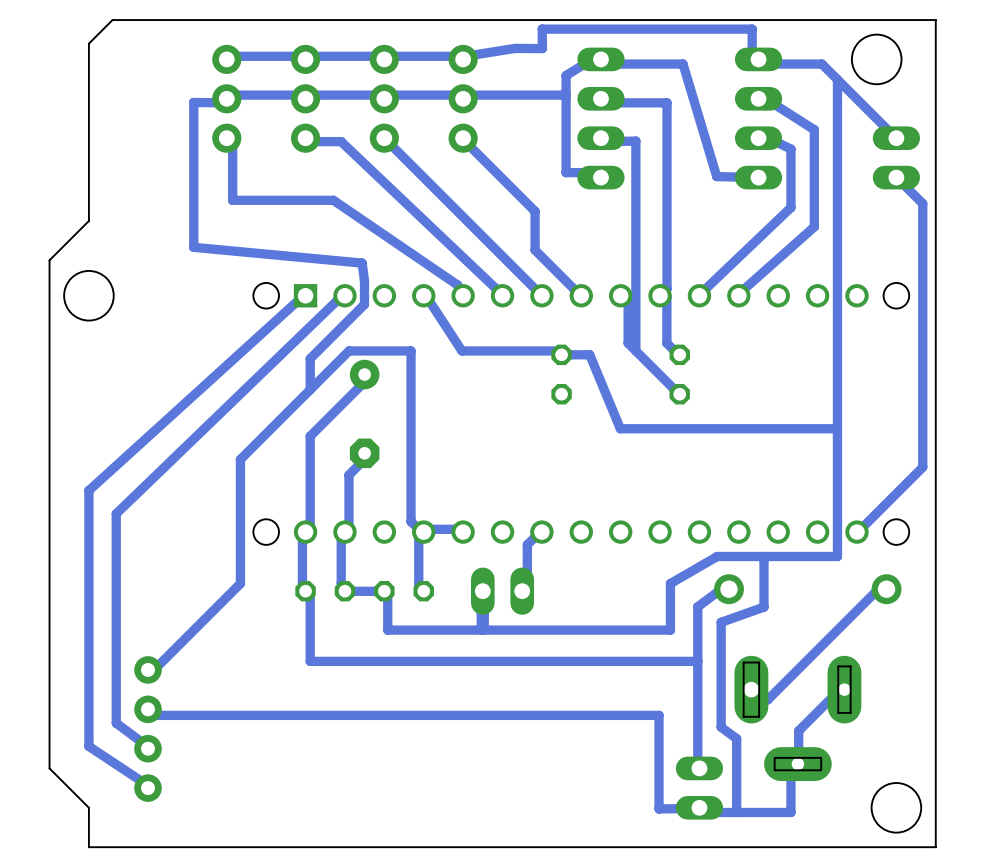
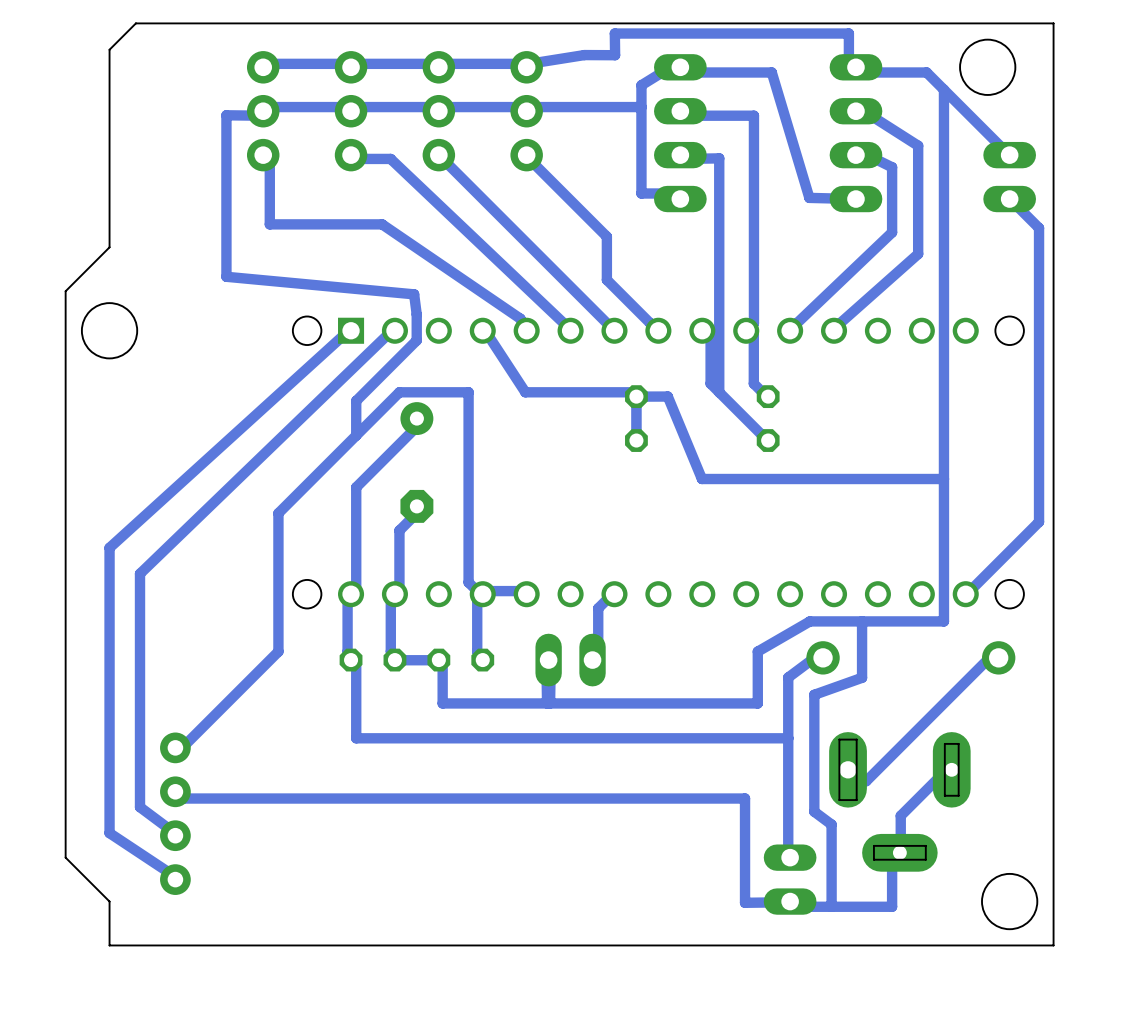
bottom track: none -> (636, 396) (636, 440)

